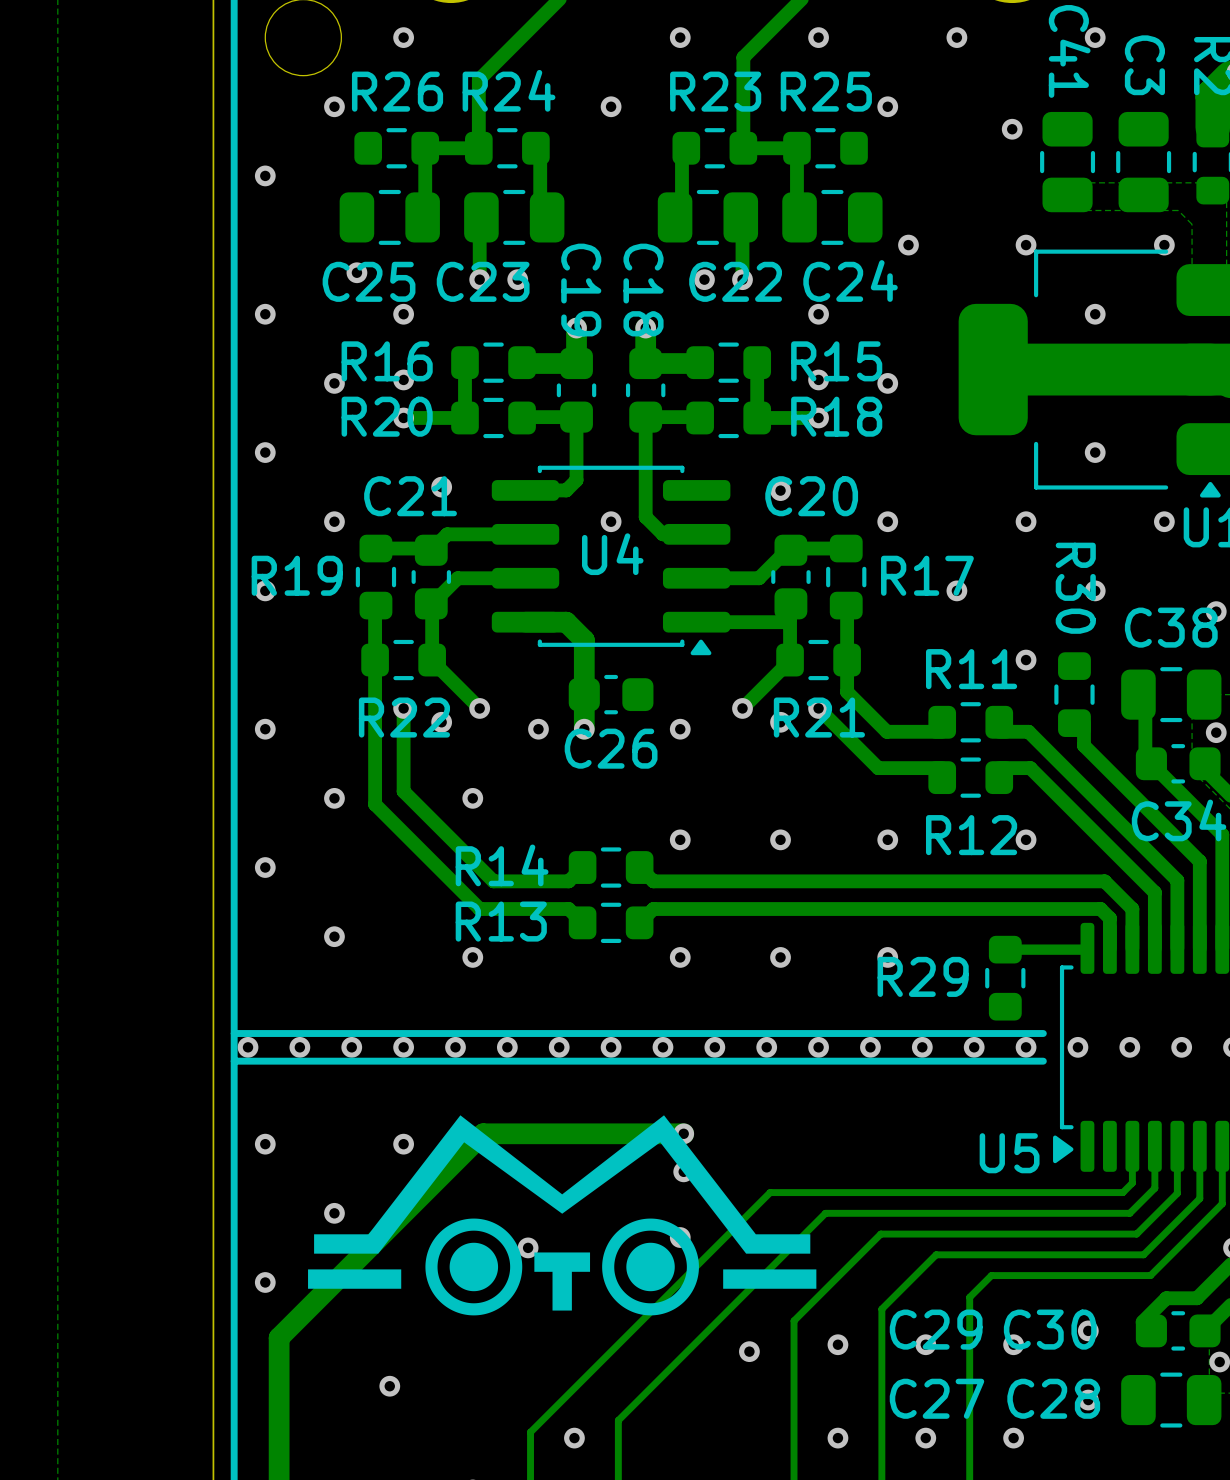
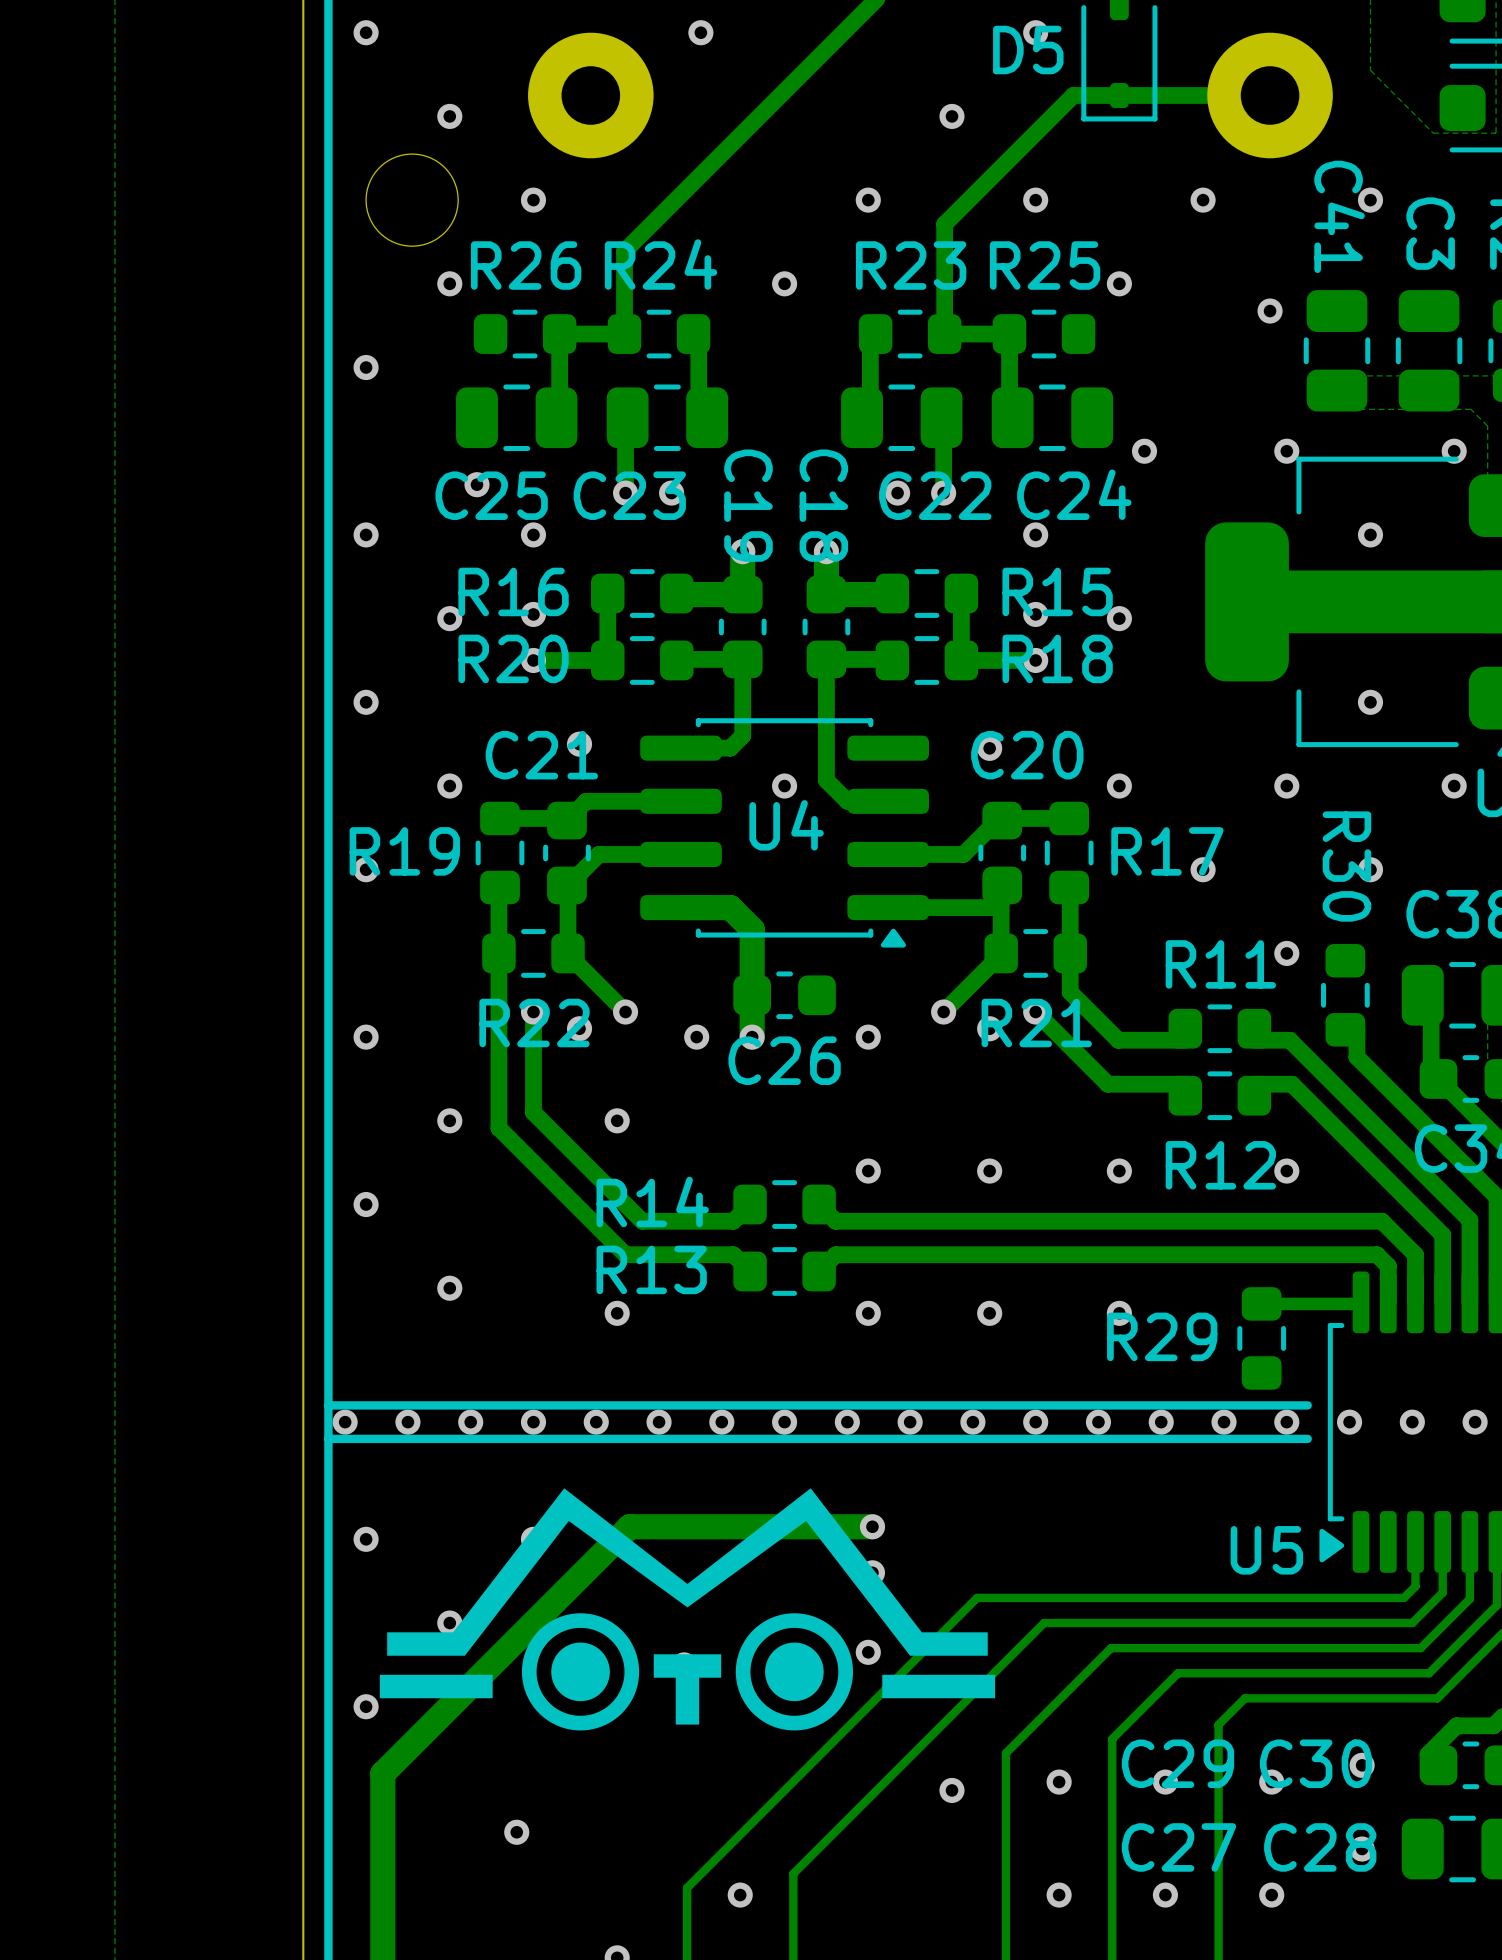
drawing position: (562, 1215) -> (687, 1609)

